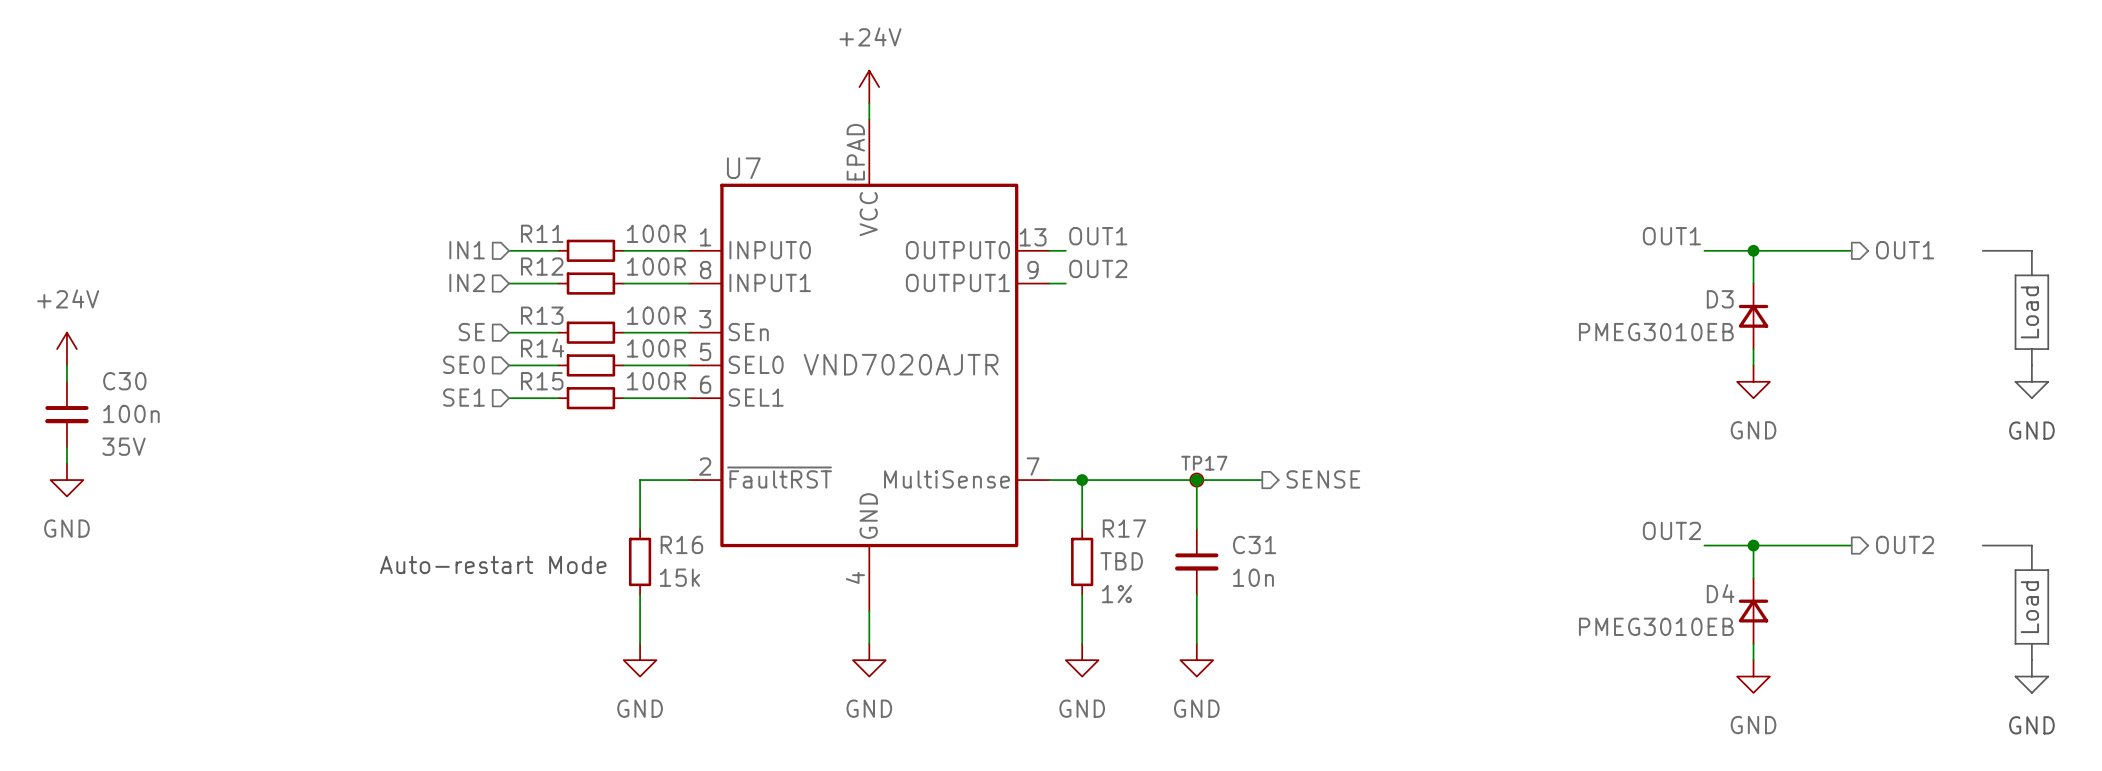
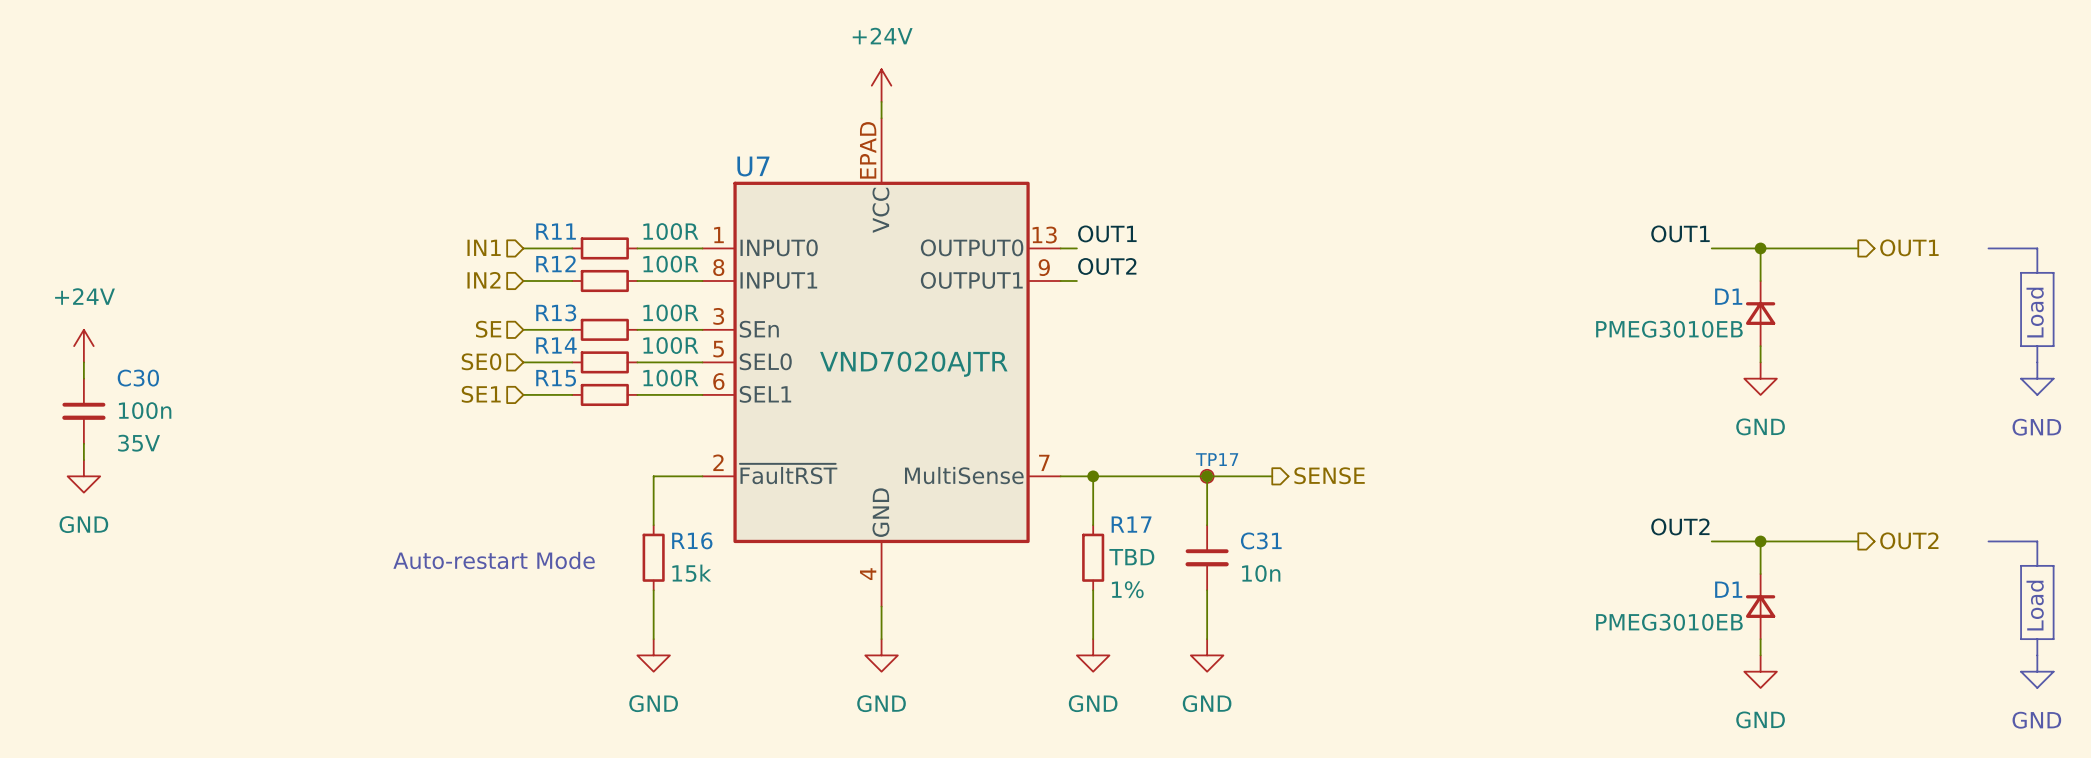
D3 name: D3 (1720, 299) -> D1 (1728, 296)
D4 name: D4 (1720, 593) -> D1 (1728, 589)

